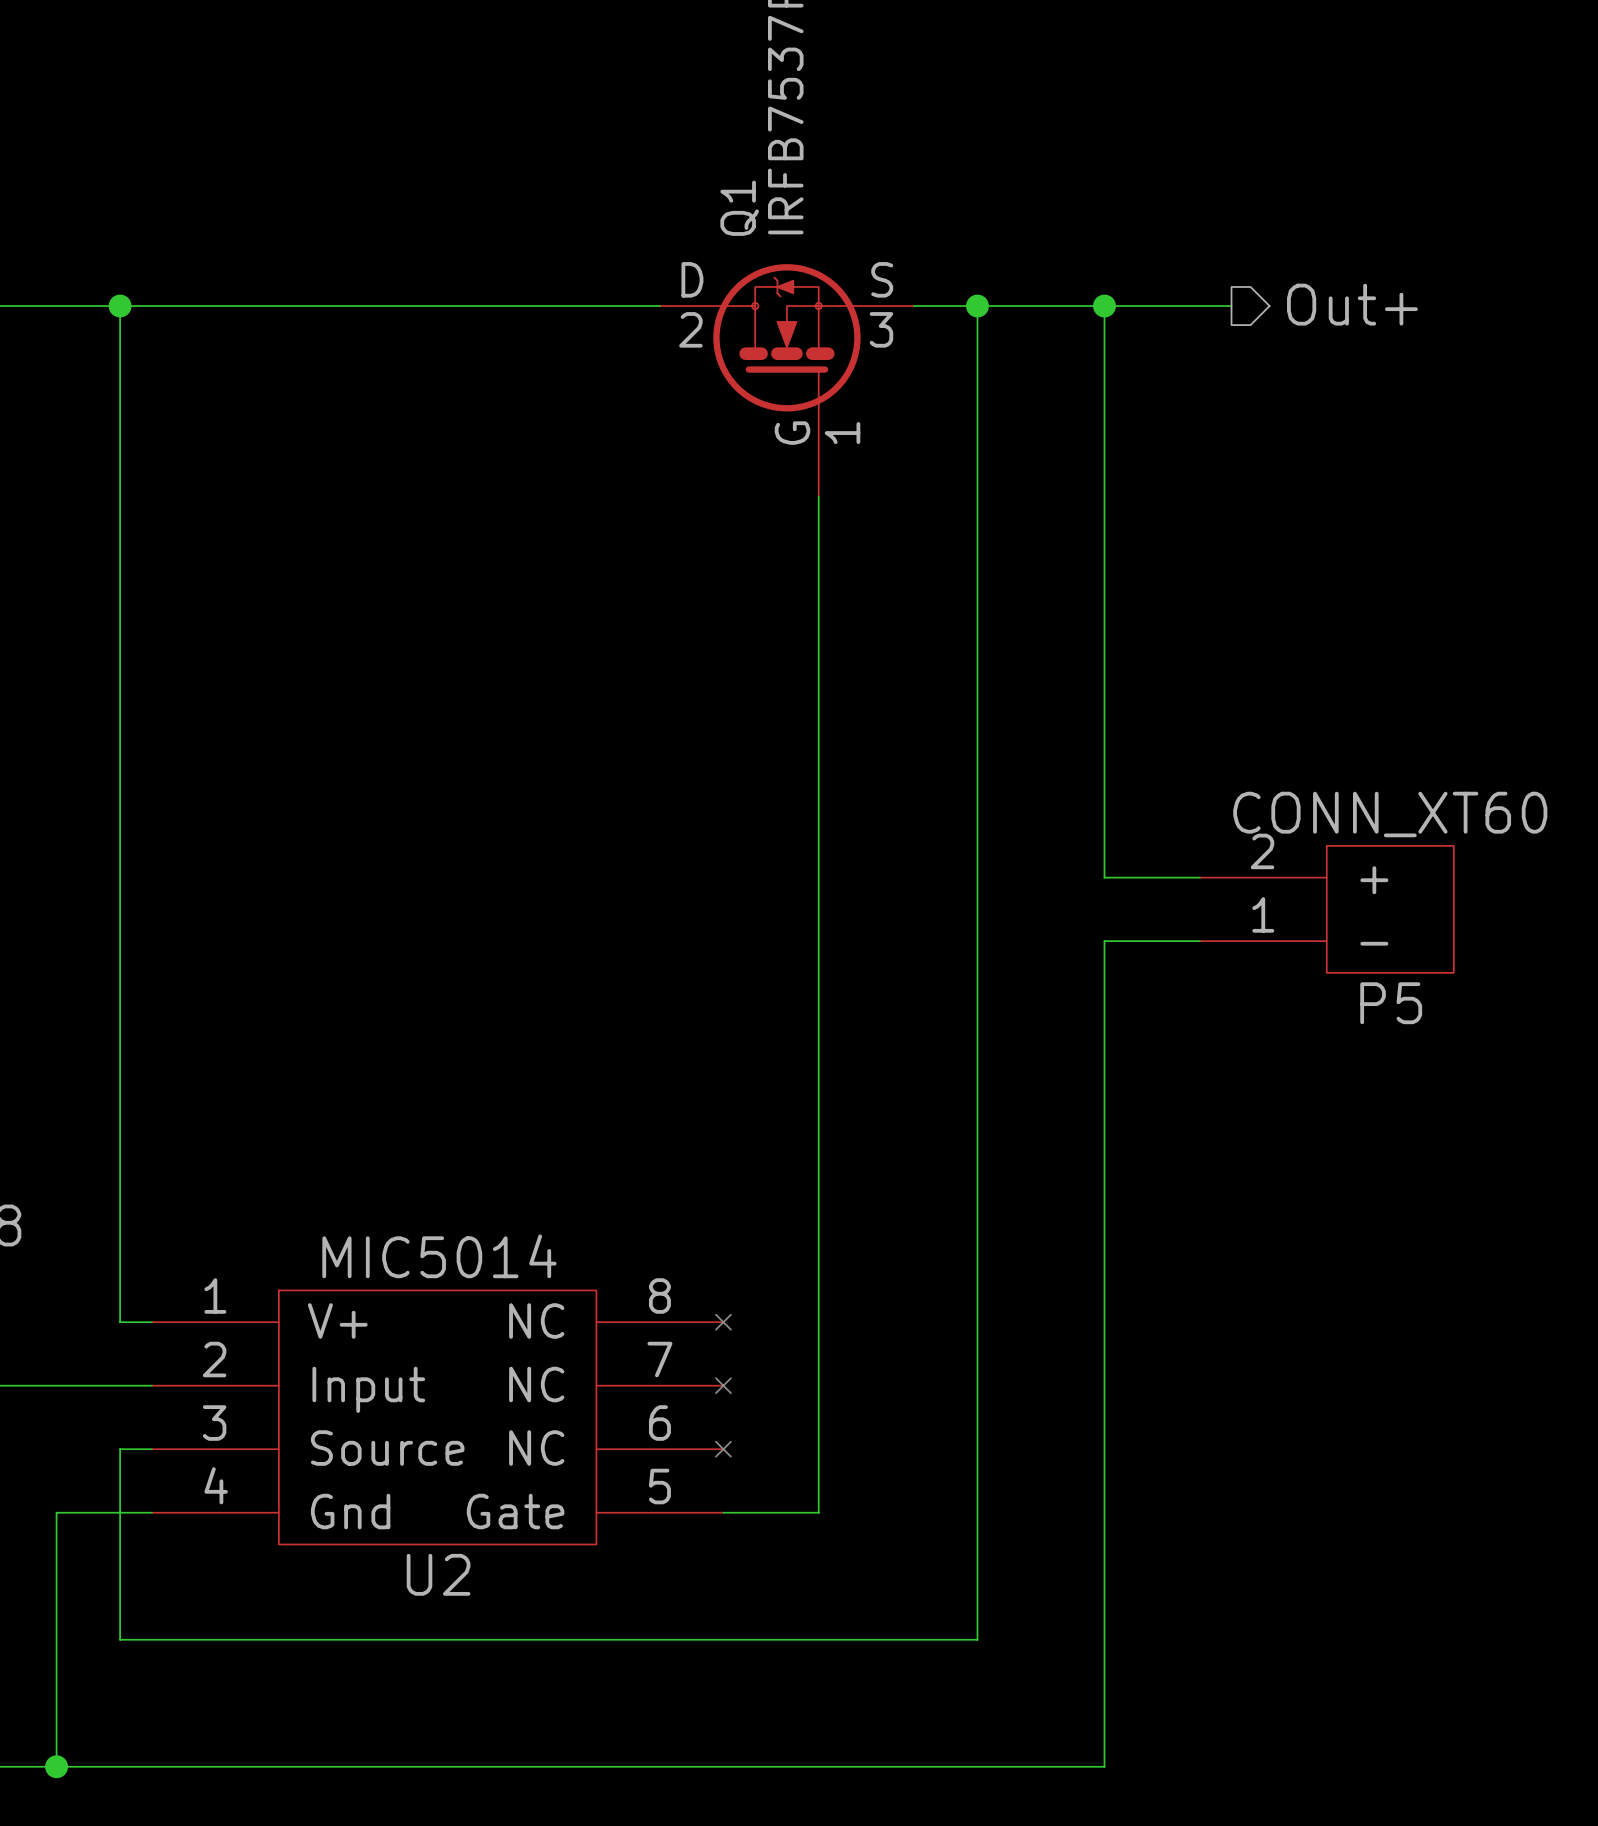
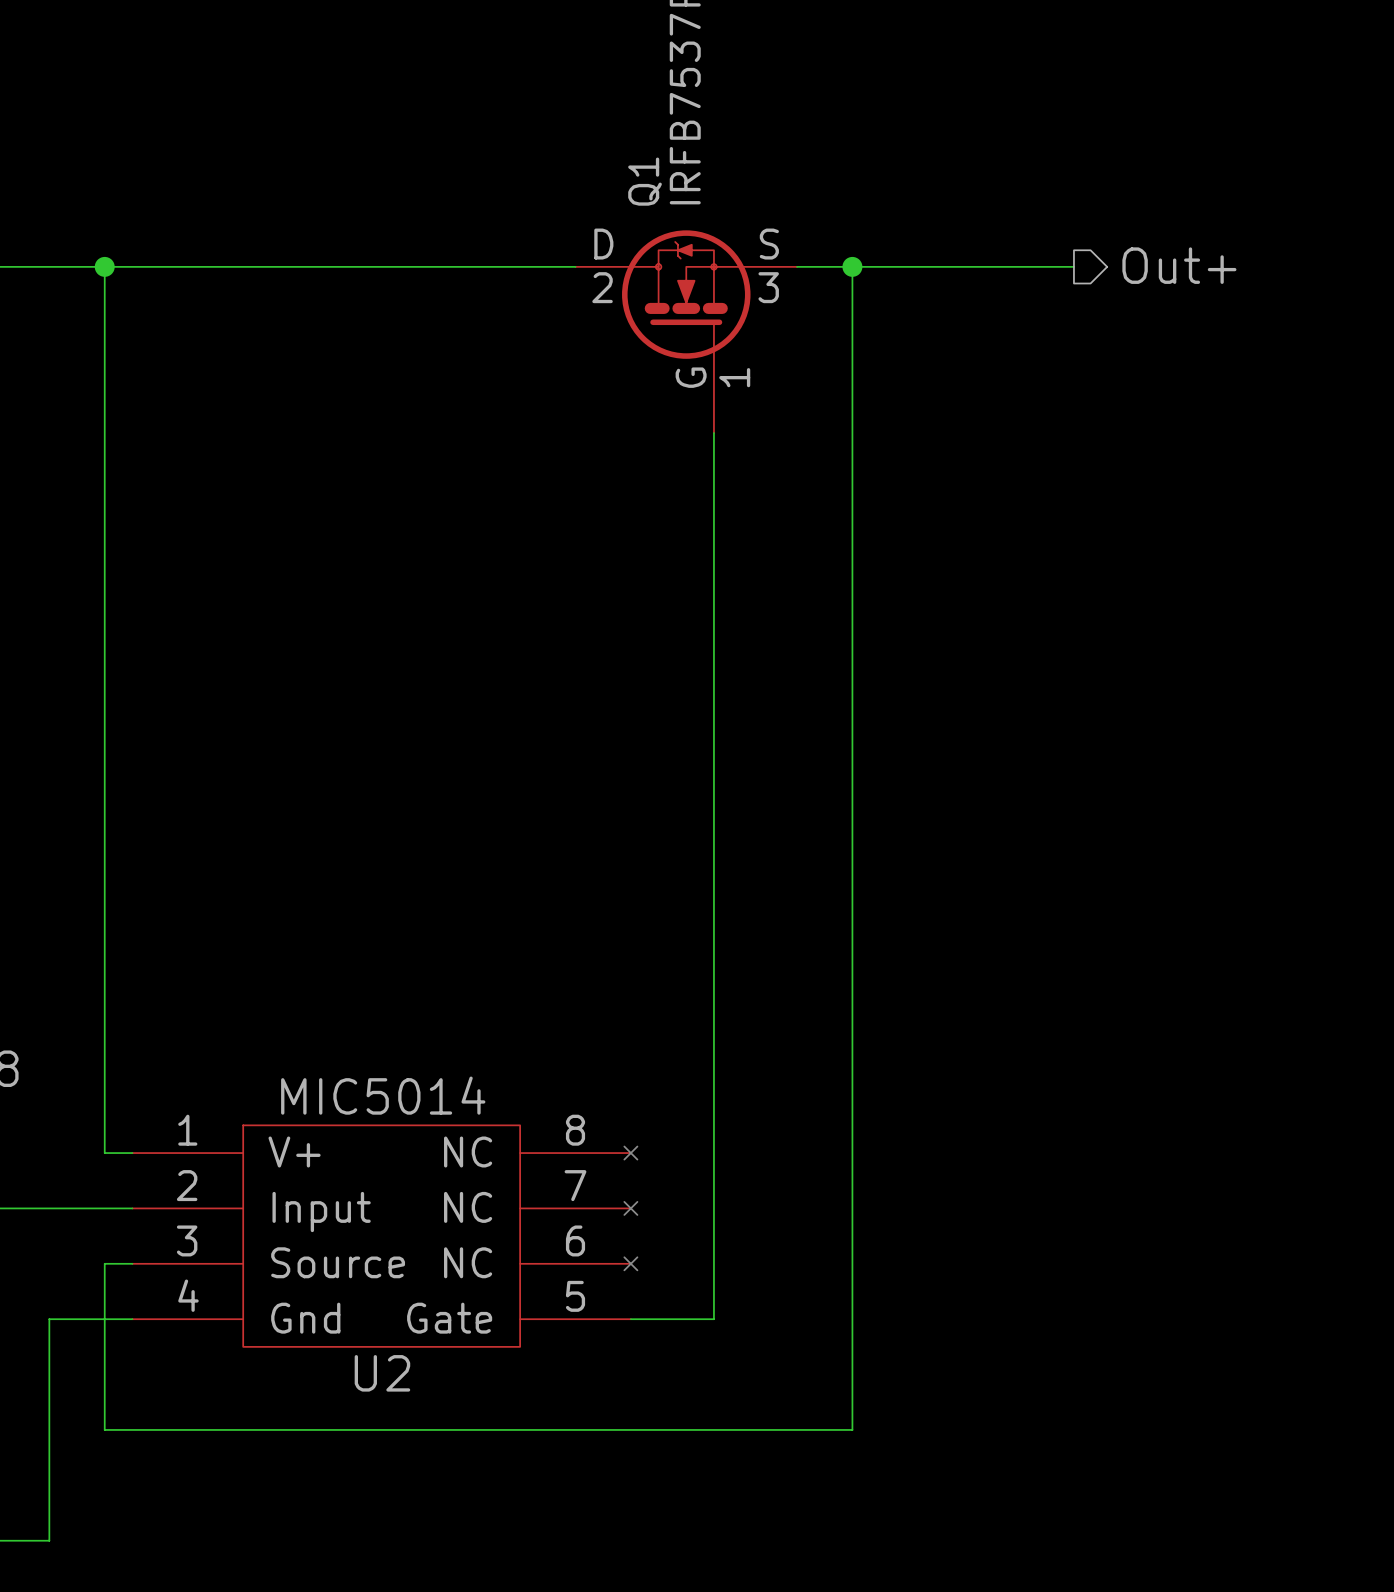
wire: (1104, 306) (1104, 877) (1199, 877) -> none
junction: (1104, 306) -> none
P5: CONN_XT60 (1326, 909) -> none
wire: (1199, 941) (1104, 941) (1104, 1766) (56, 1766) -> none
junction: (56, 1766) -> none

